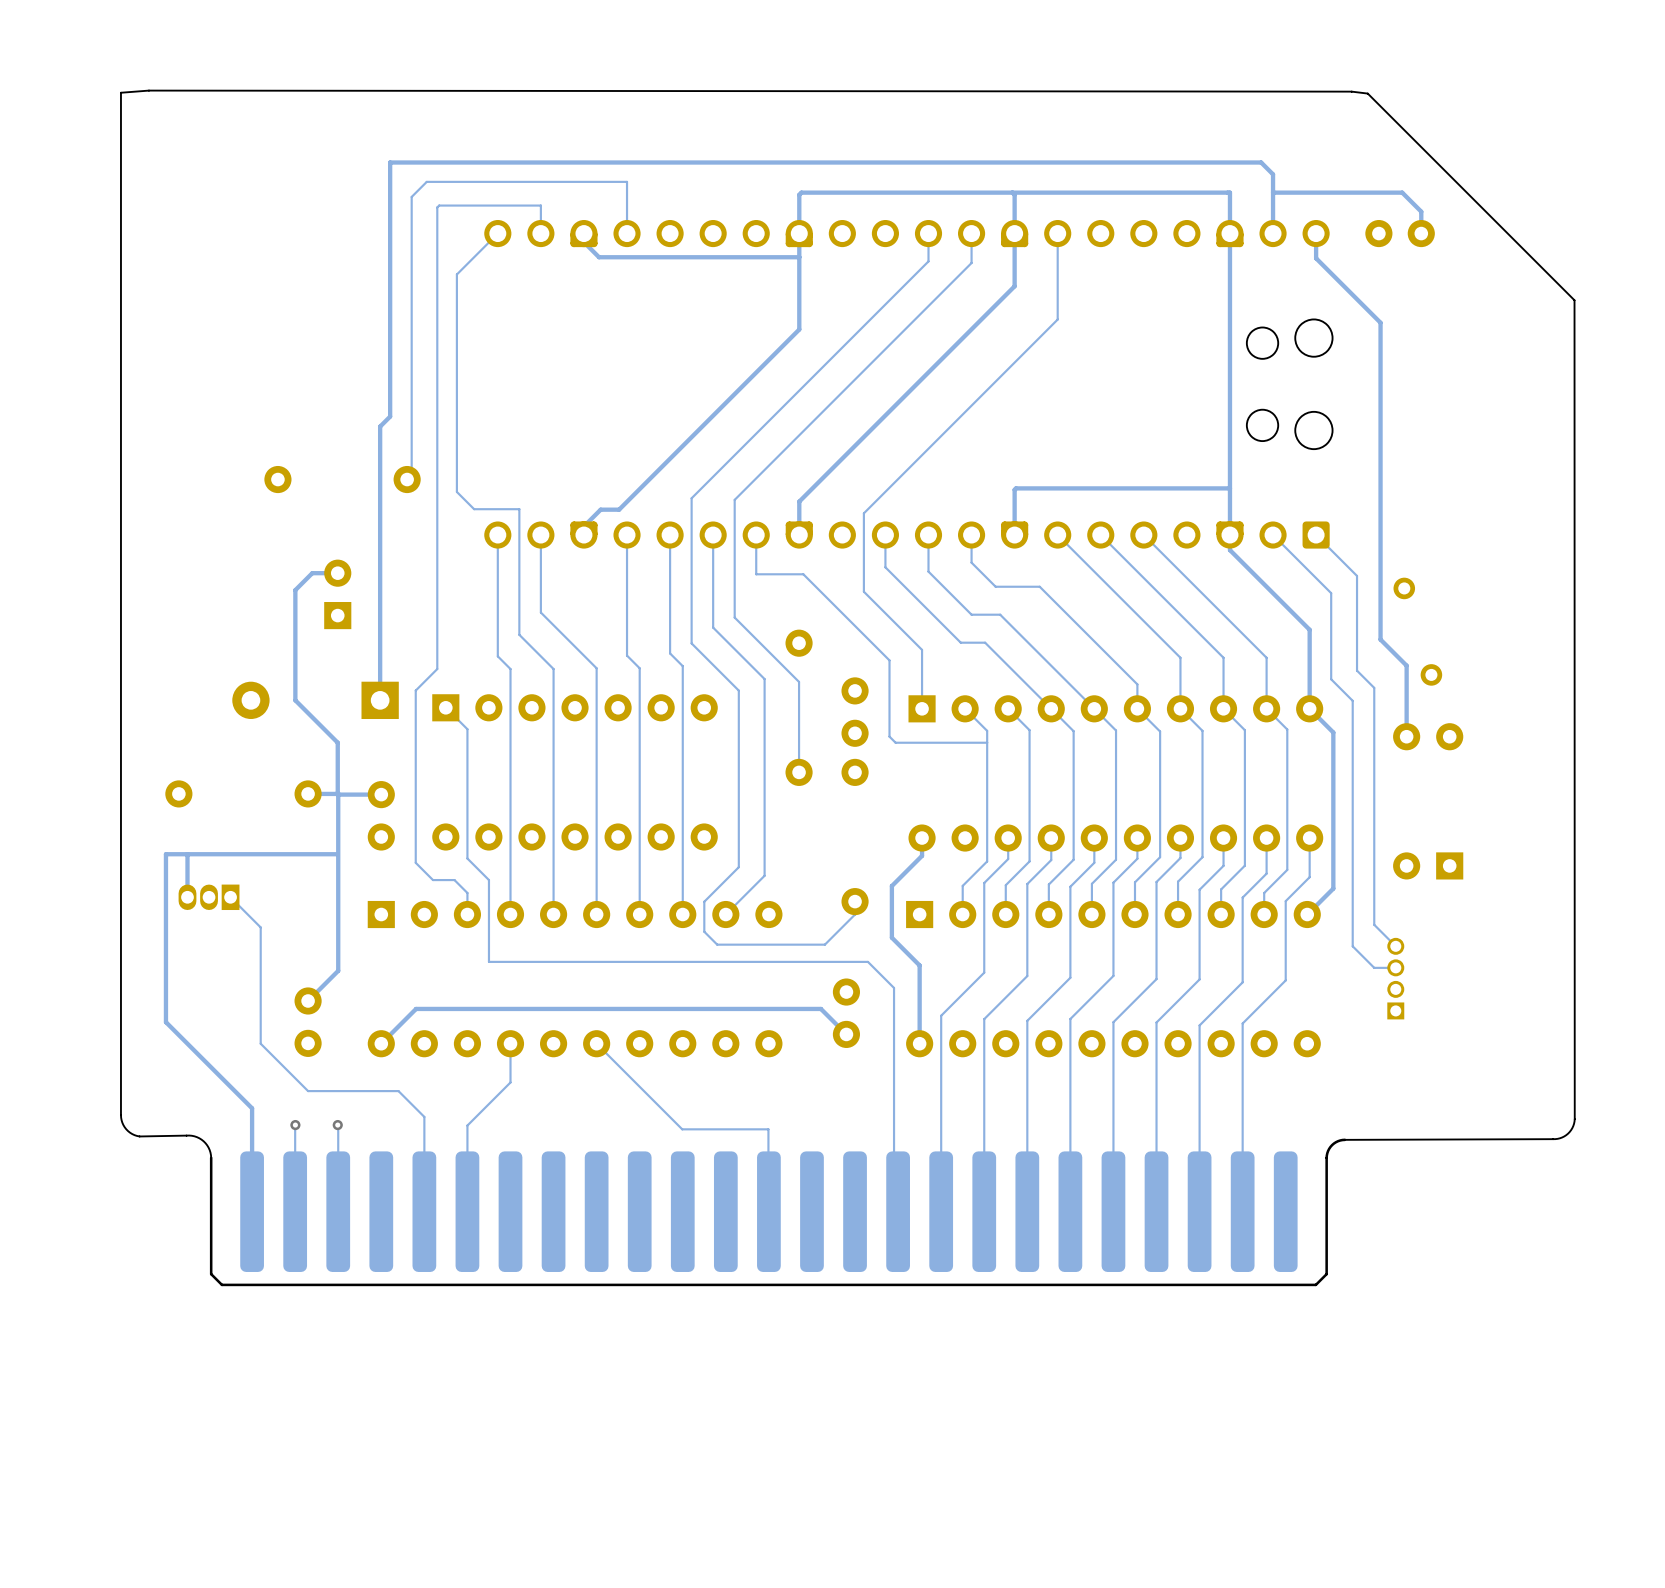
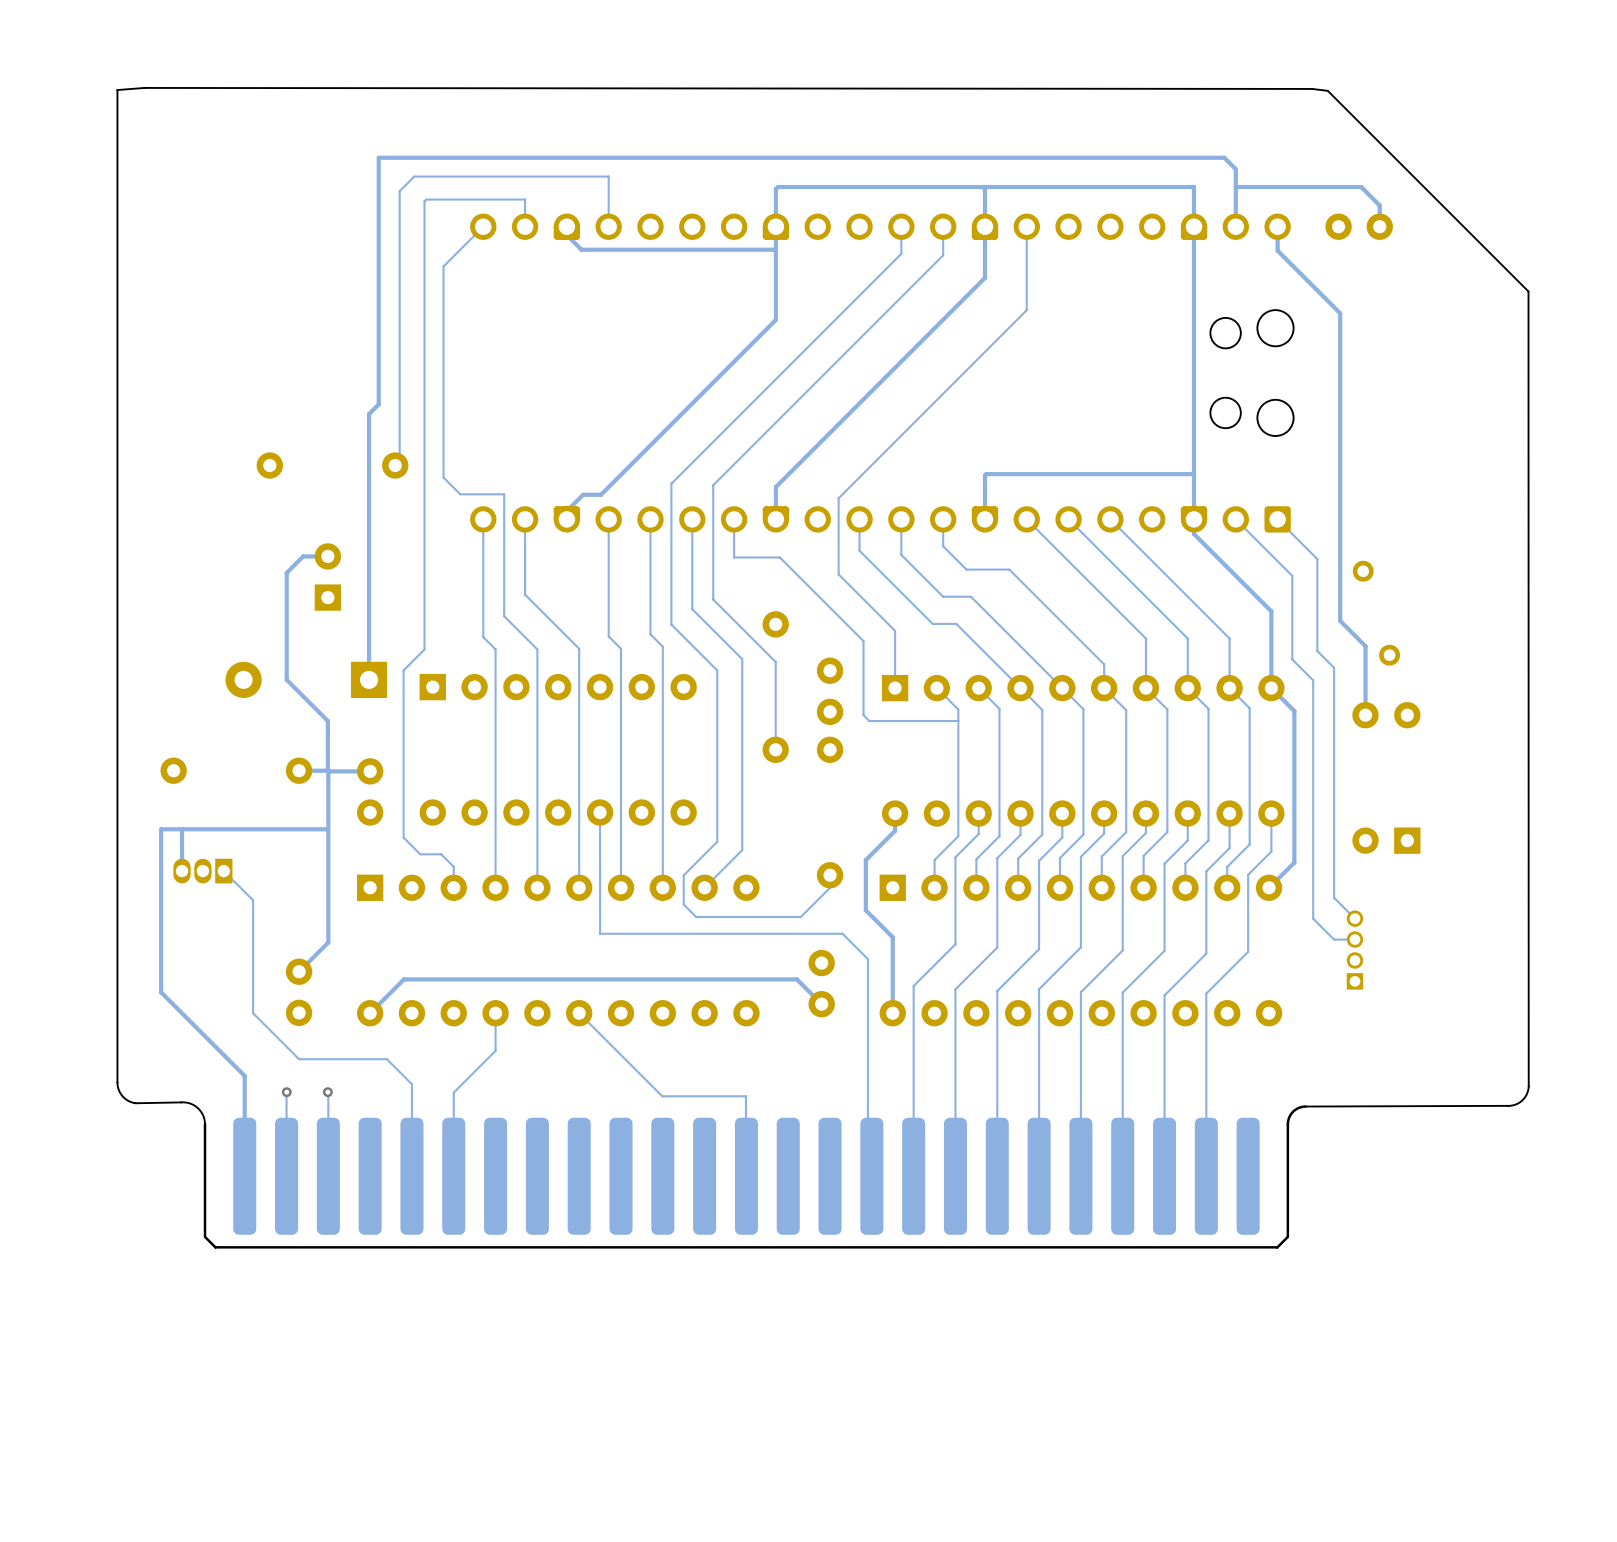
track: (445, 707) (467, 729) (467, 858) (488, 880) (488, 961) (618, 961) -> (600, 858) (600, 933)
track: none -> (600, 812) (600, 858)

